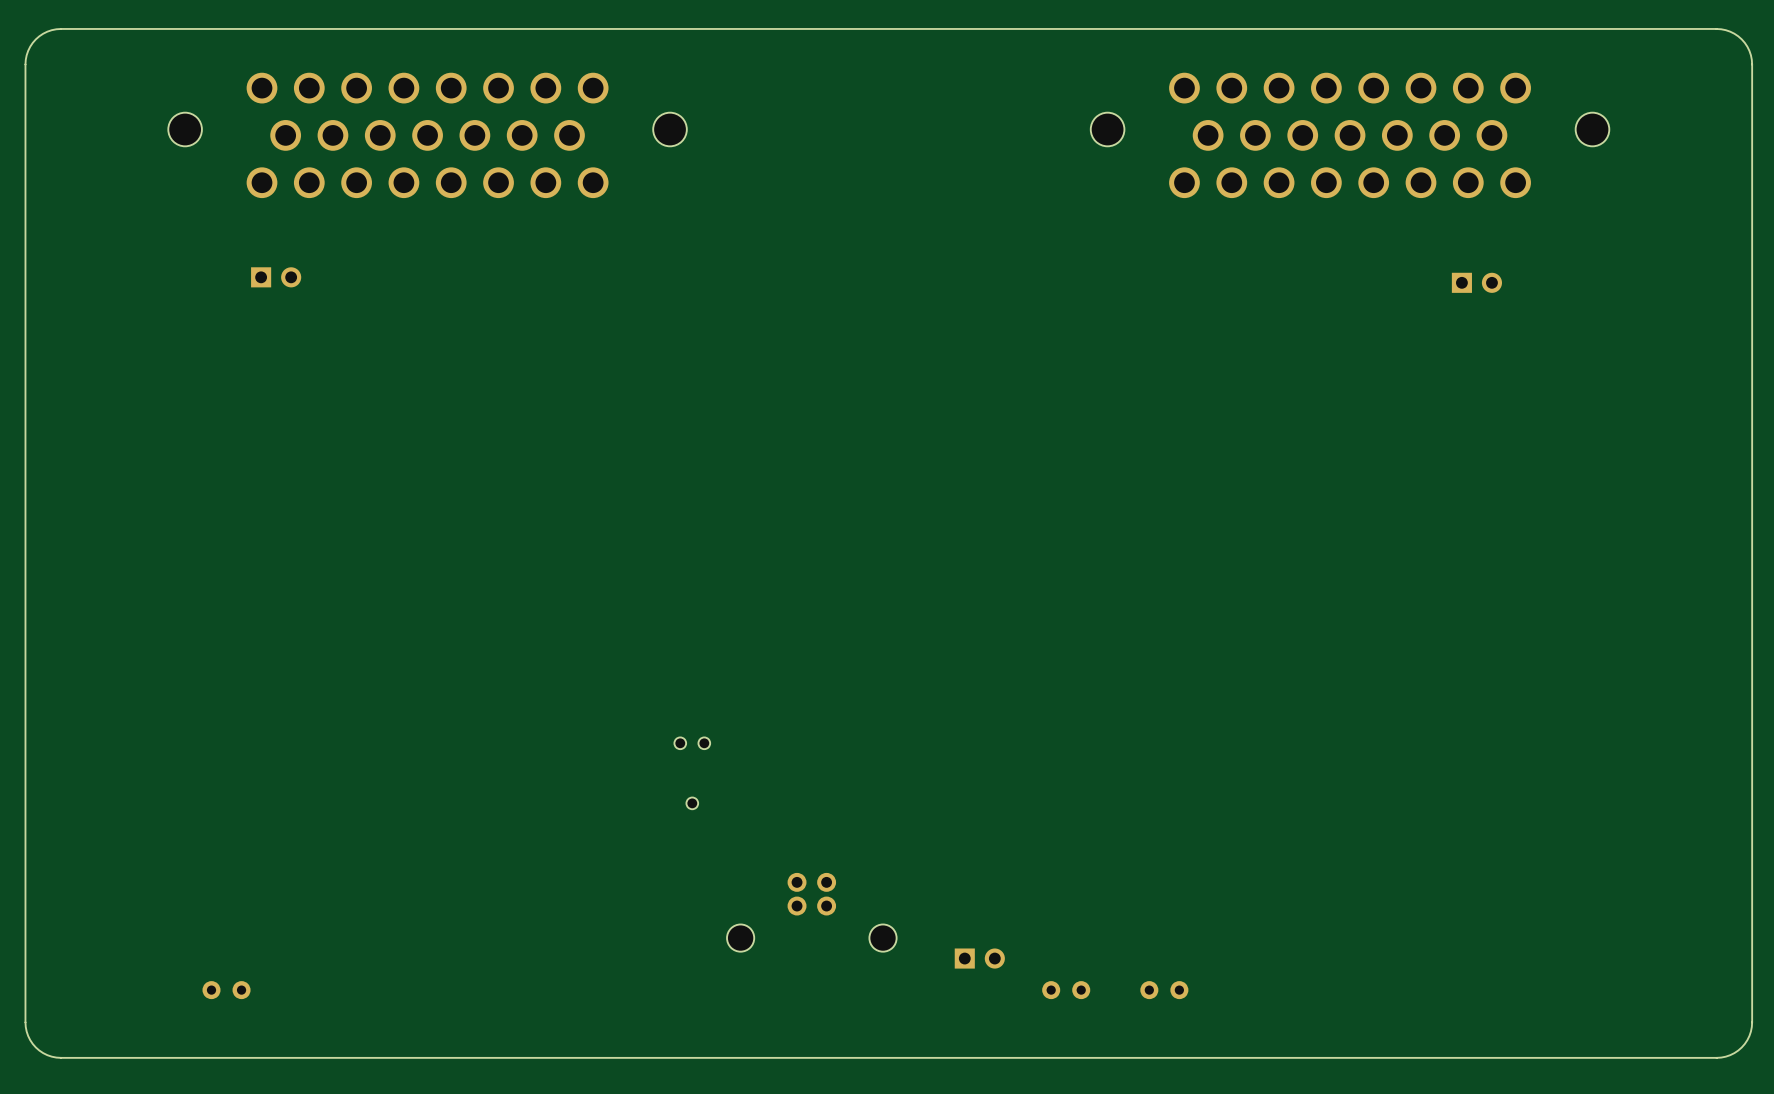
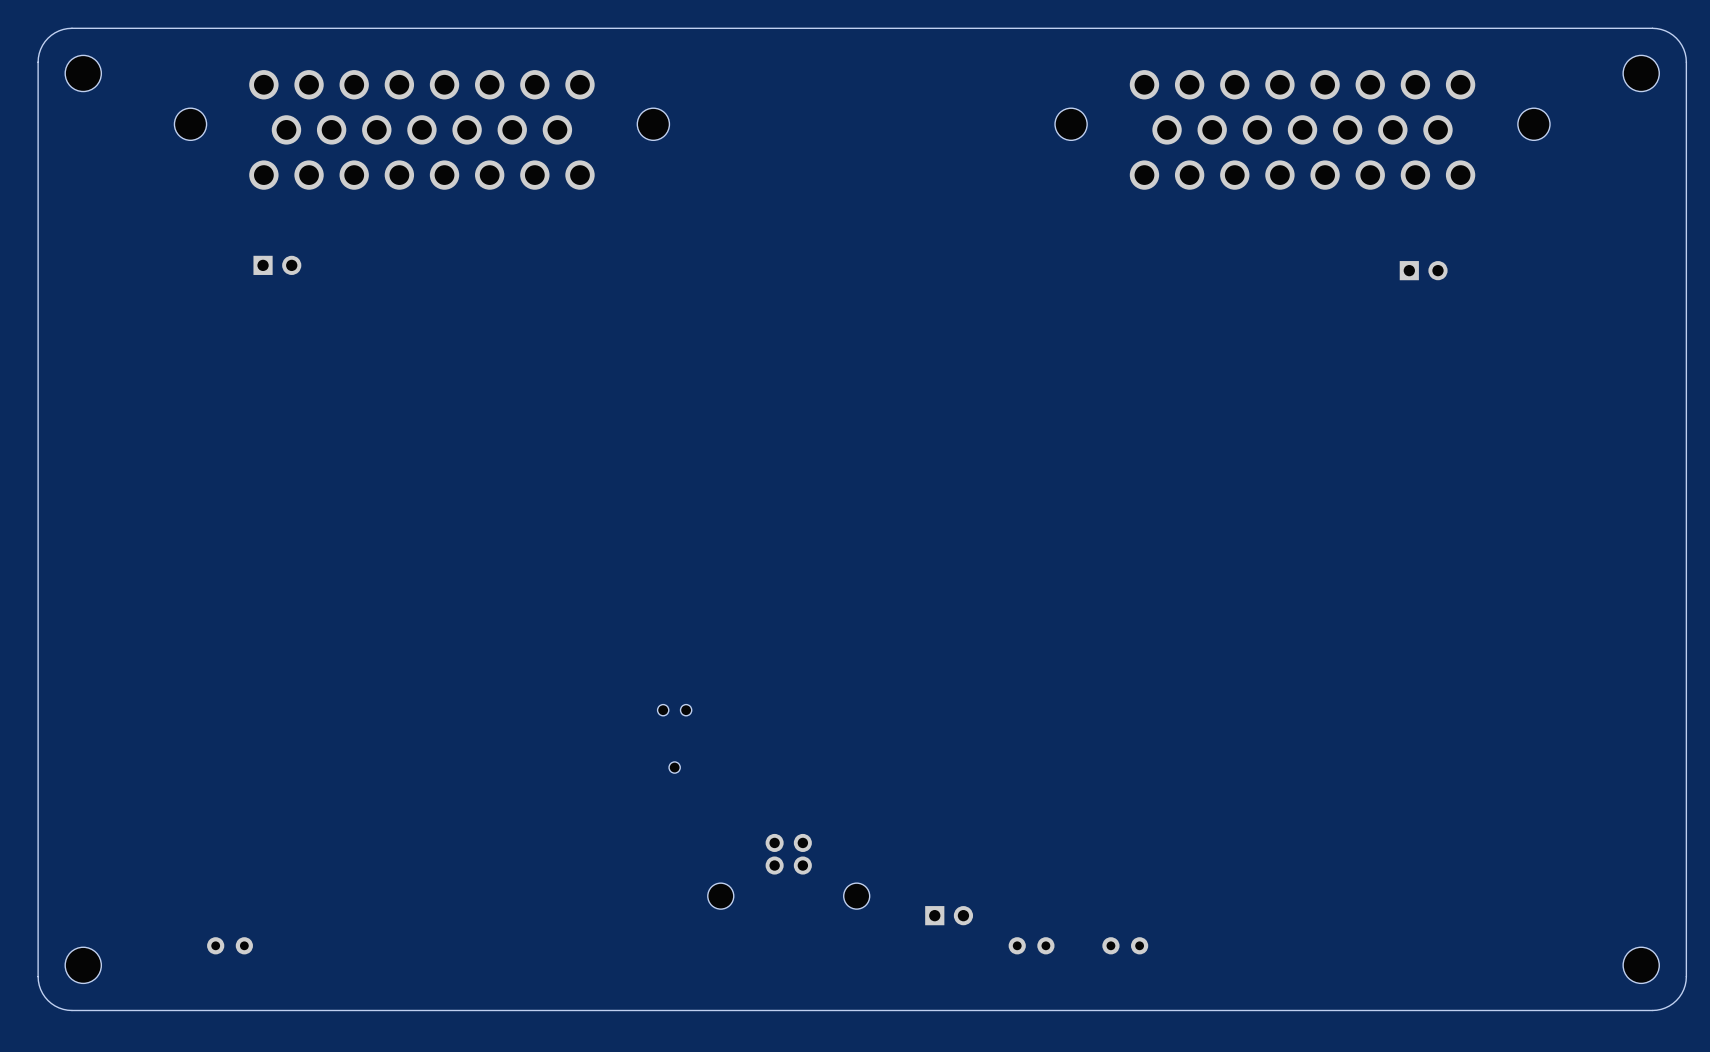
part: none -> (83, 73)
part: none -> (1641, 73)
part: none -> (83, 965)
part: none -> (1641, 965)

